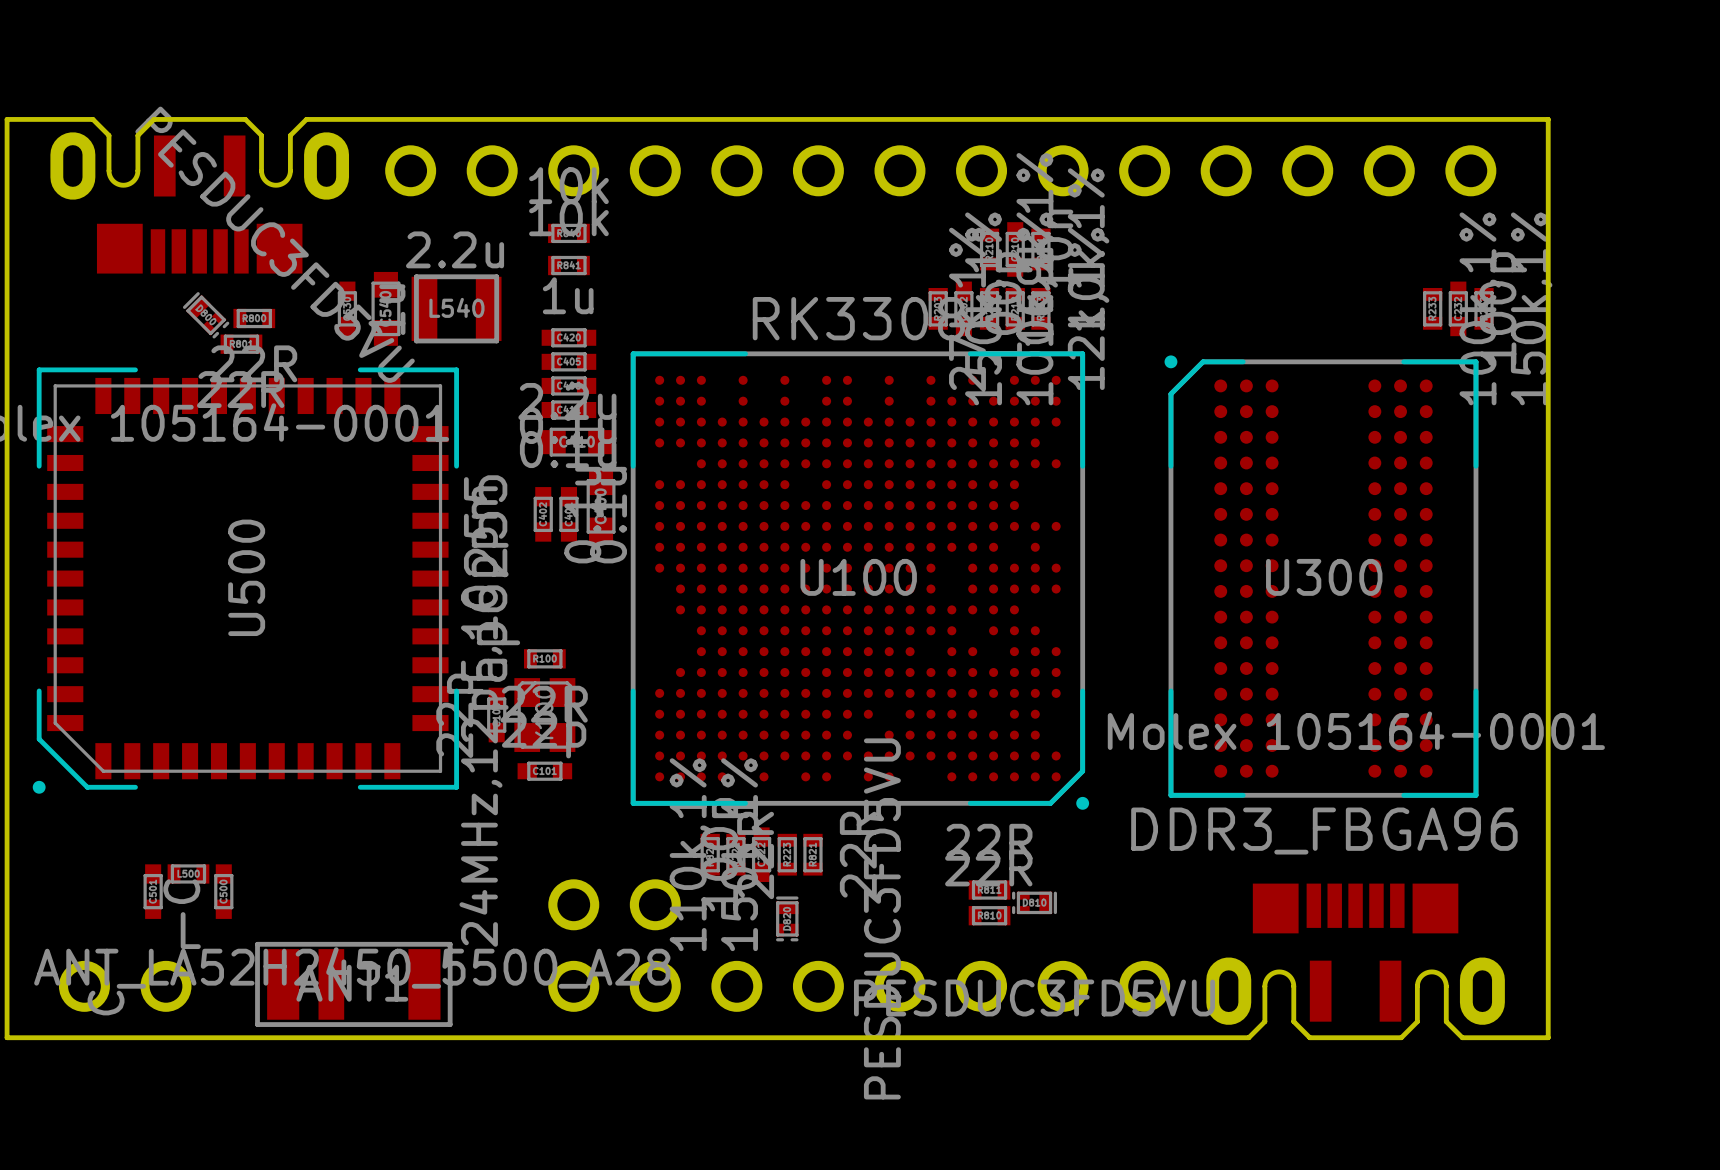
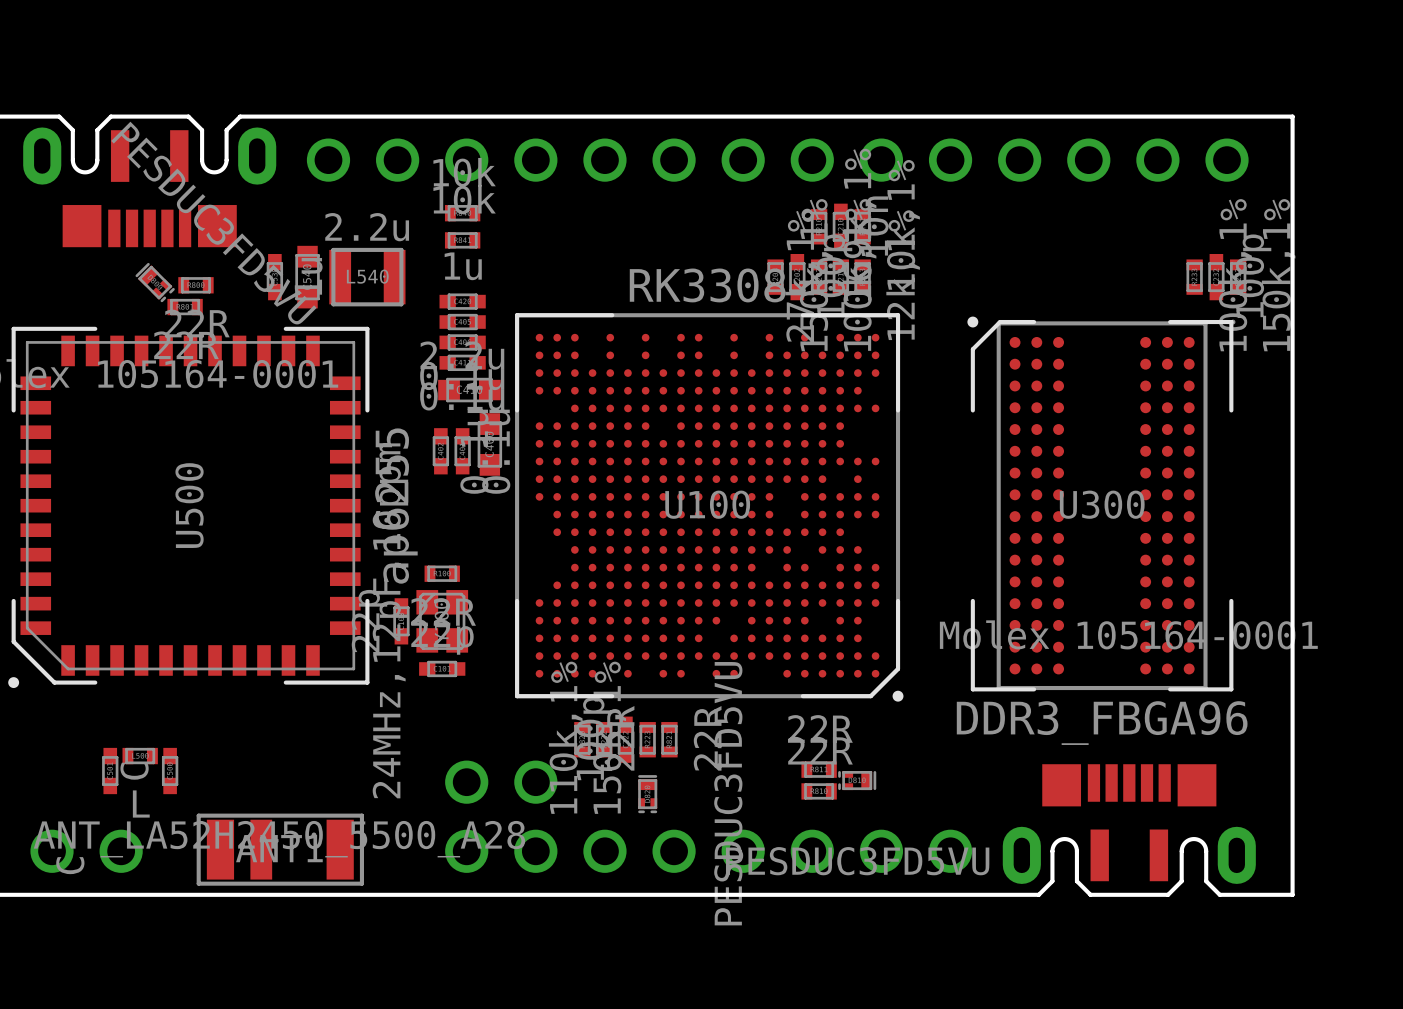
U300 footprint: [1164, 355, 1479, 798] -> [967, 316, 1234, 692]

